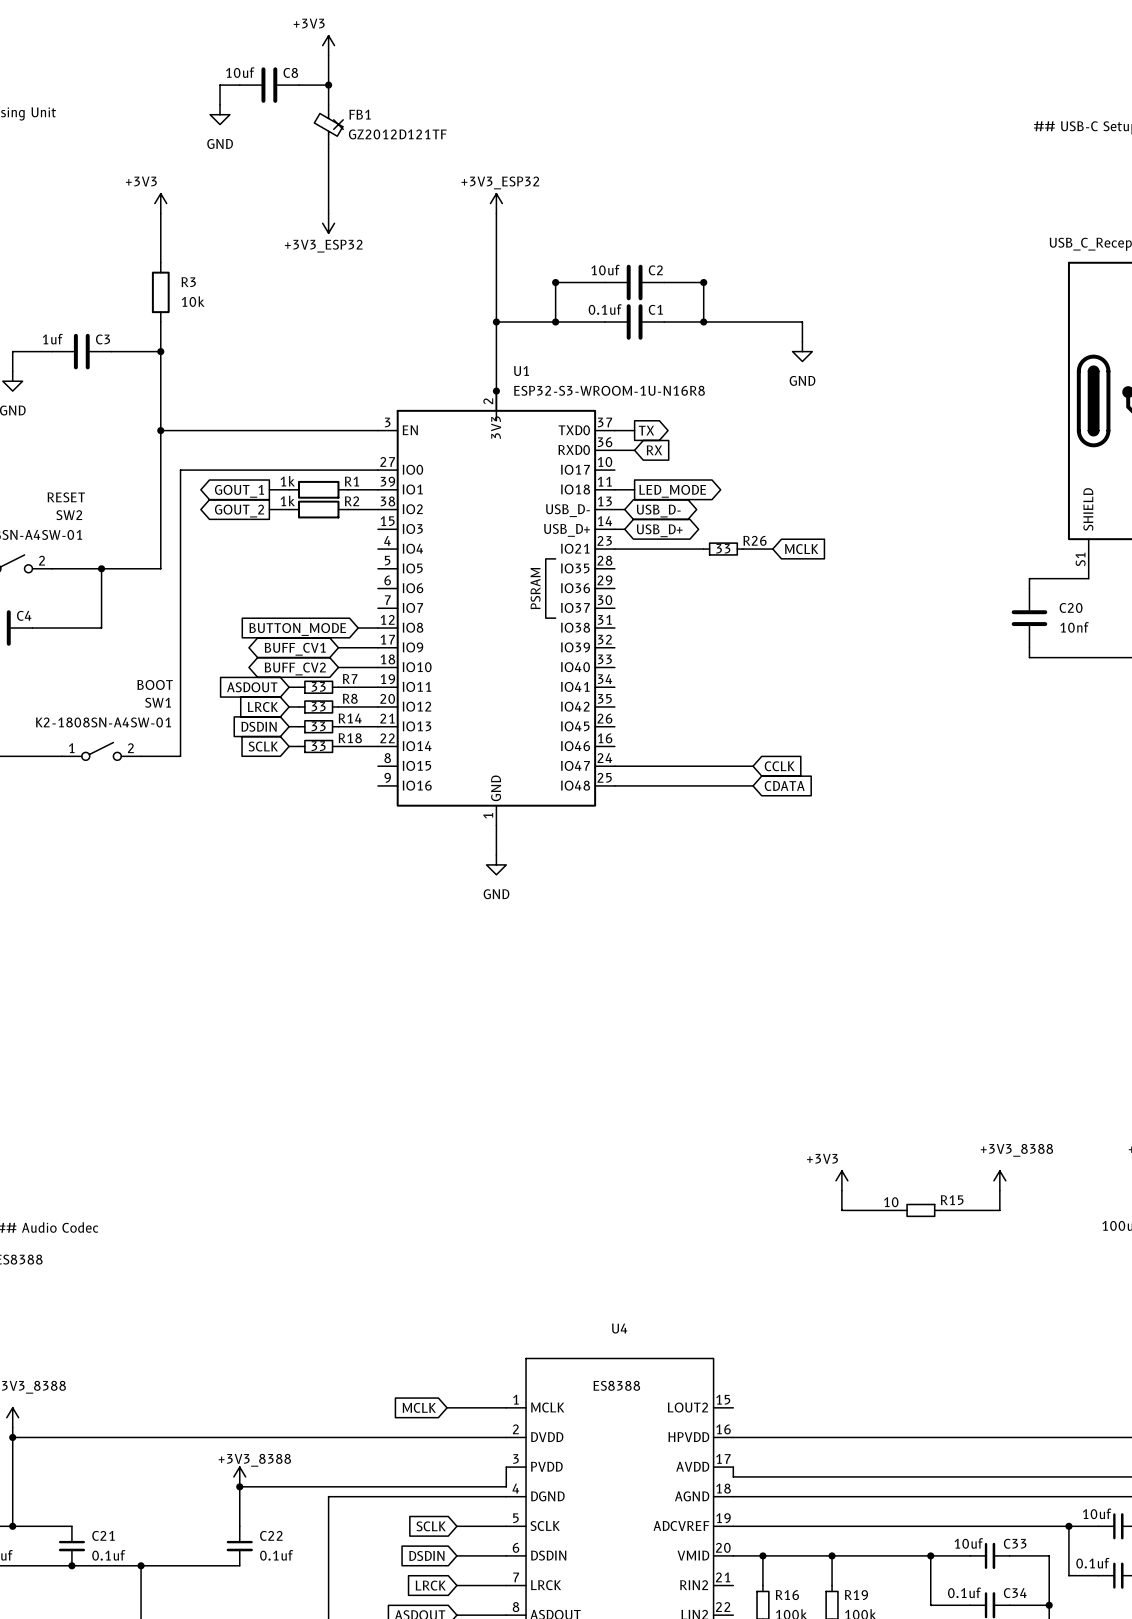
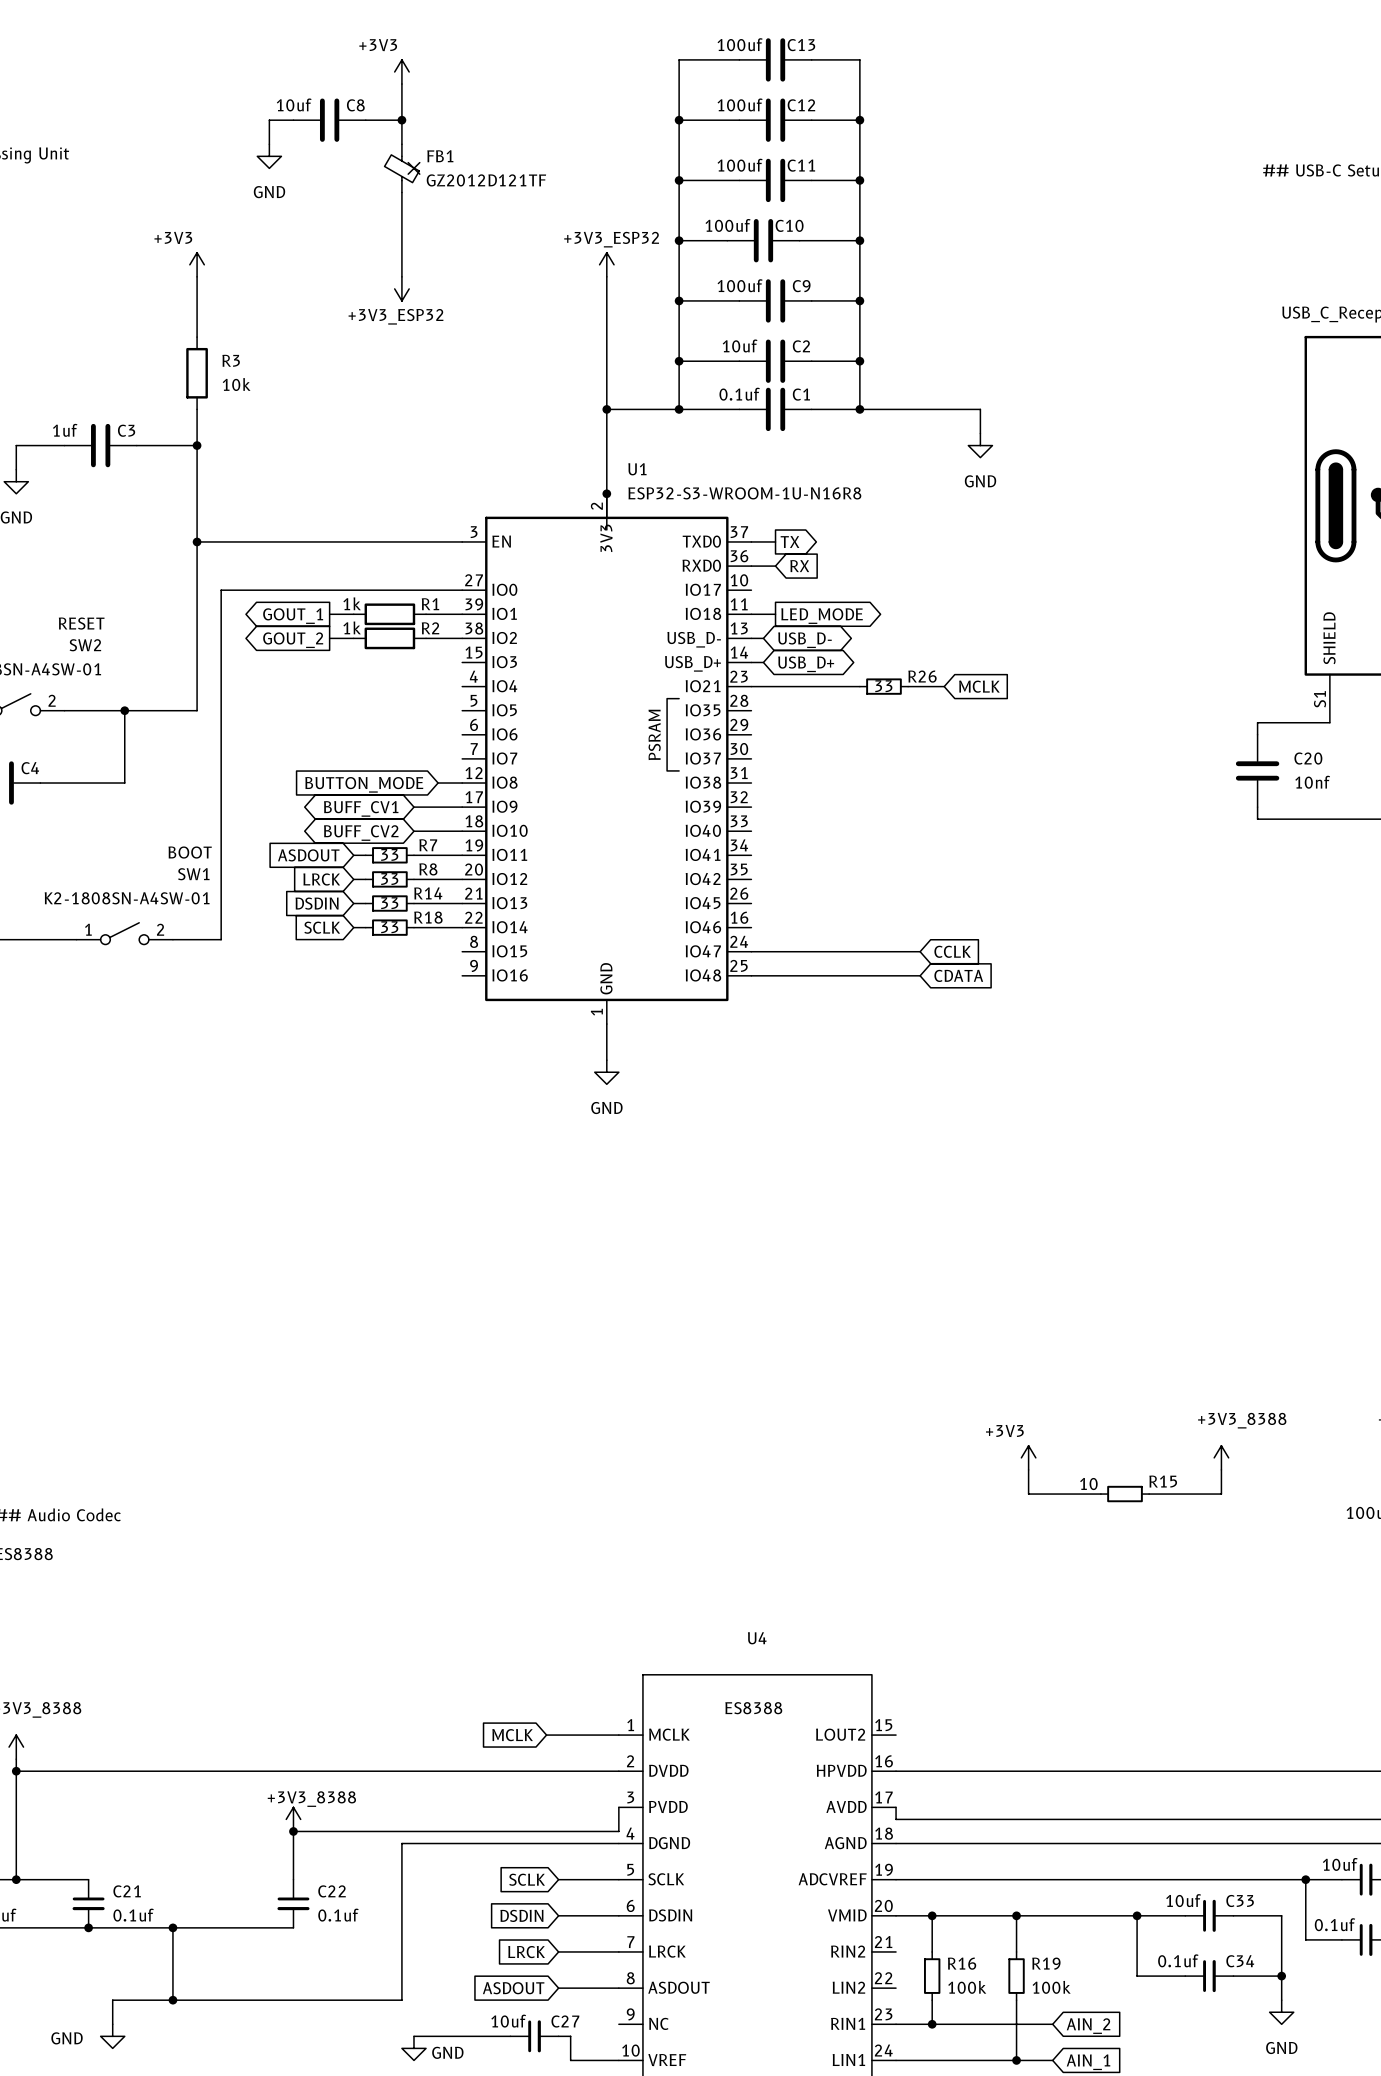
wire: none -> (739, 59) (679, 59) (679, 361)
C13: none -> 100uf (775, 59)
wire: none -> (811, 59) (859, 59) (859, 361)
wire: none -> (679, 120) (739, 120)
junction: none -> (679, 120)
C12: none -> 100uf (775, 120)
wire: none -> (811, 120) (859, 120)
junction: none -> (859, 120)
wire: none -> (679, 180) (739, 180)
junction: none -> (679, 180)
C11: none -> 100uf (775, 180)
wire: none -> (811, 180) (859, 180)
junction: none -> (859, 180)
wire: none -> (679, 240) (727, 240)
junction: none -> (679, 240)
C10: none -> 100uf (763, 240)
wire: none -> (799, 240) (859, 240)
junction: none -> (859, 240)
wire: none -> (679, 300) (739, 300)
junction: none -> (679, 300)
C9: none -> 100uf (775, 300)
wire: none -> (811, 300) (859, 300)
junction: none -> (859, 300)

